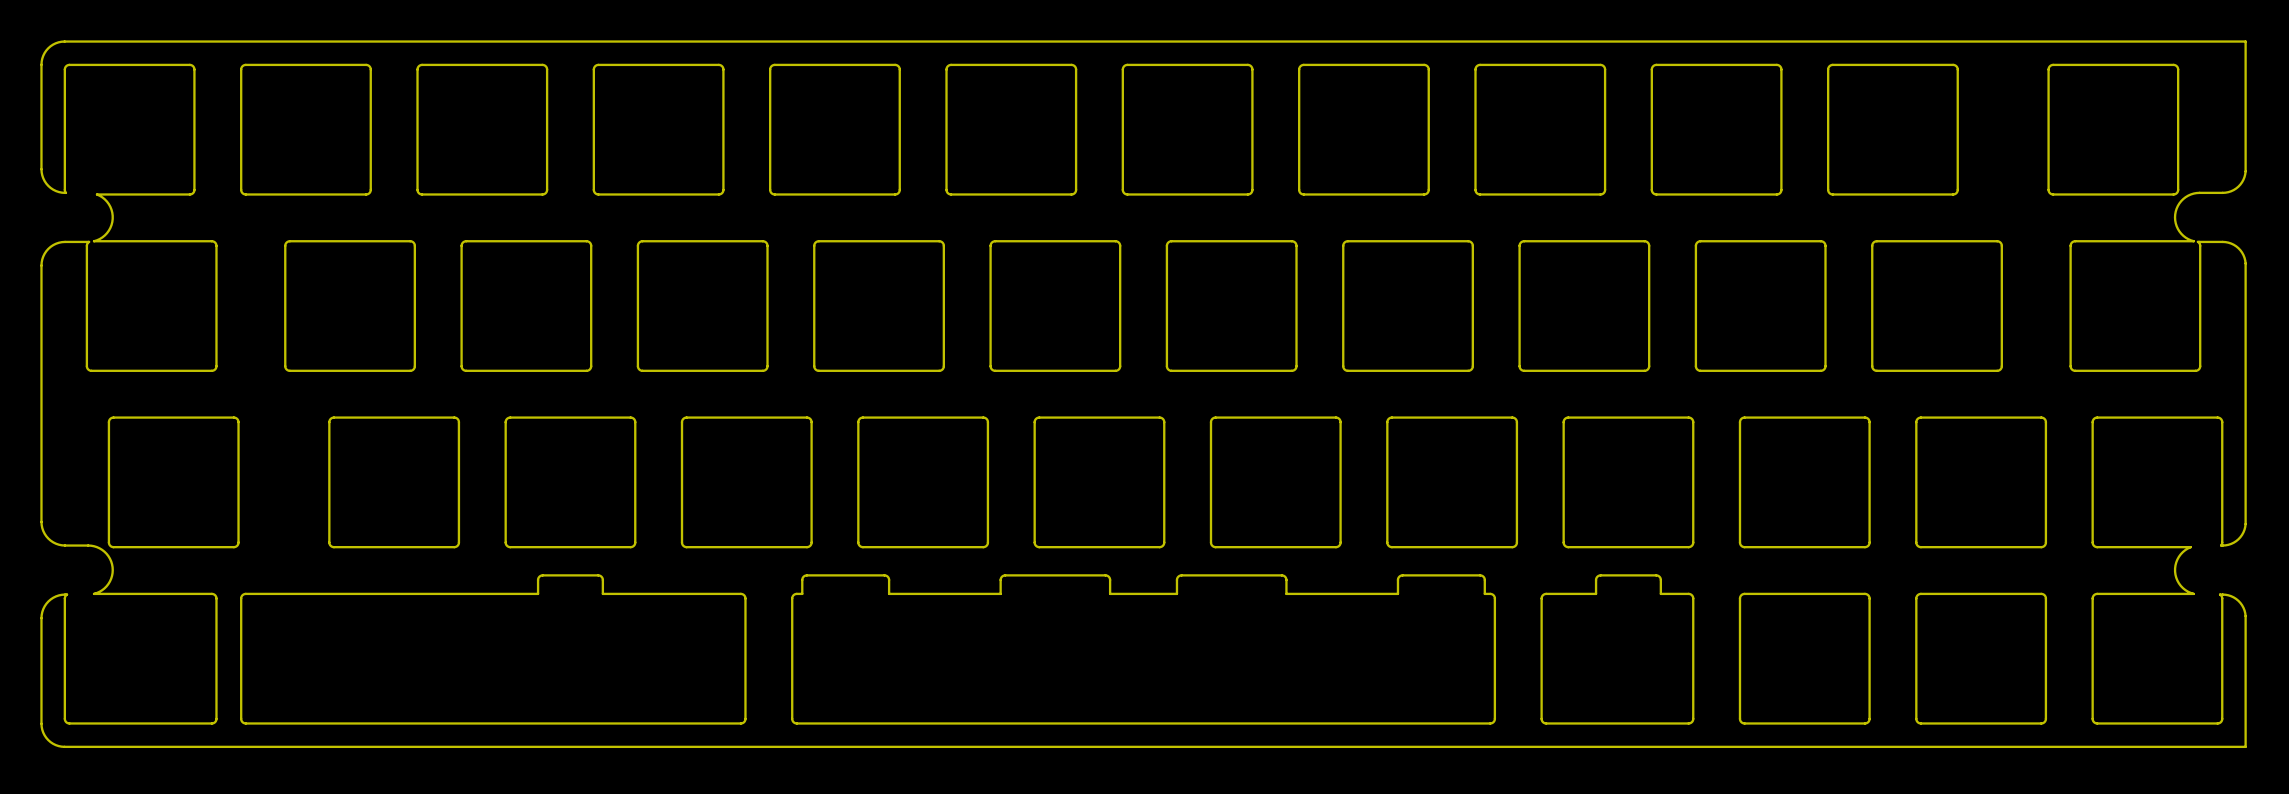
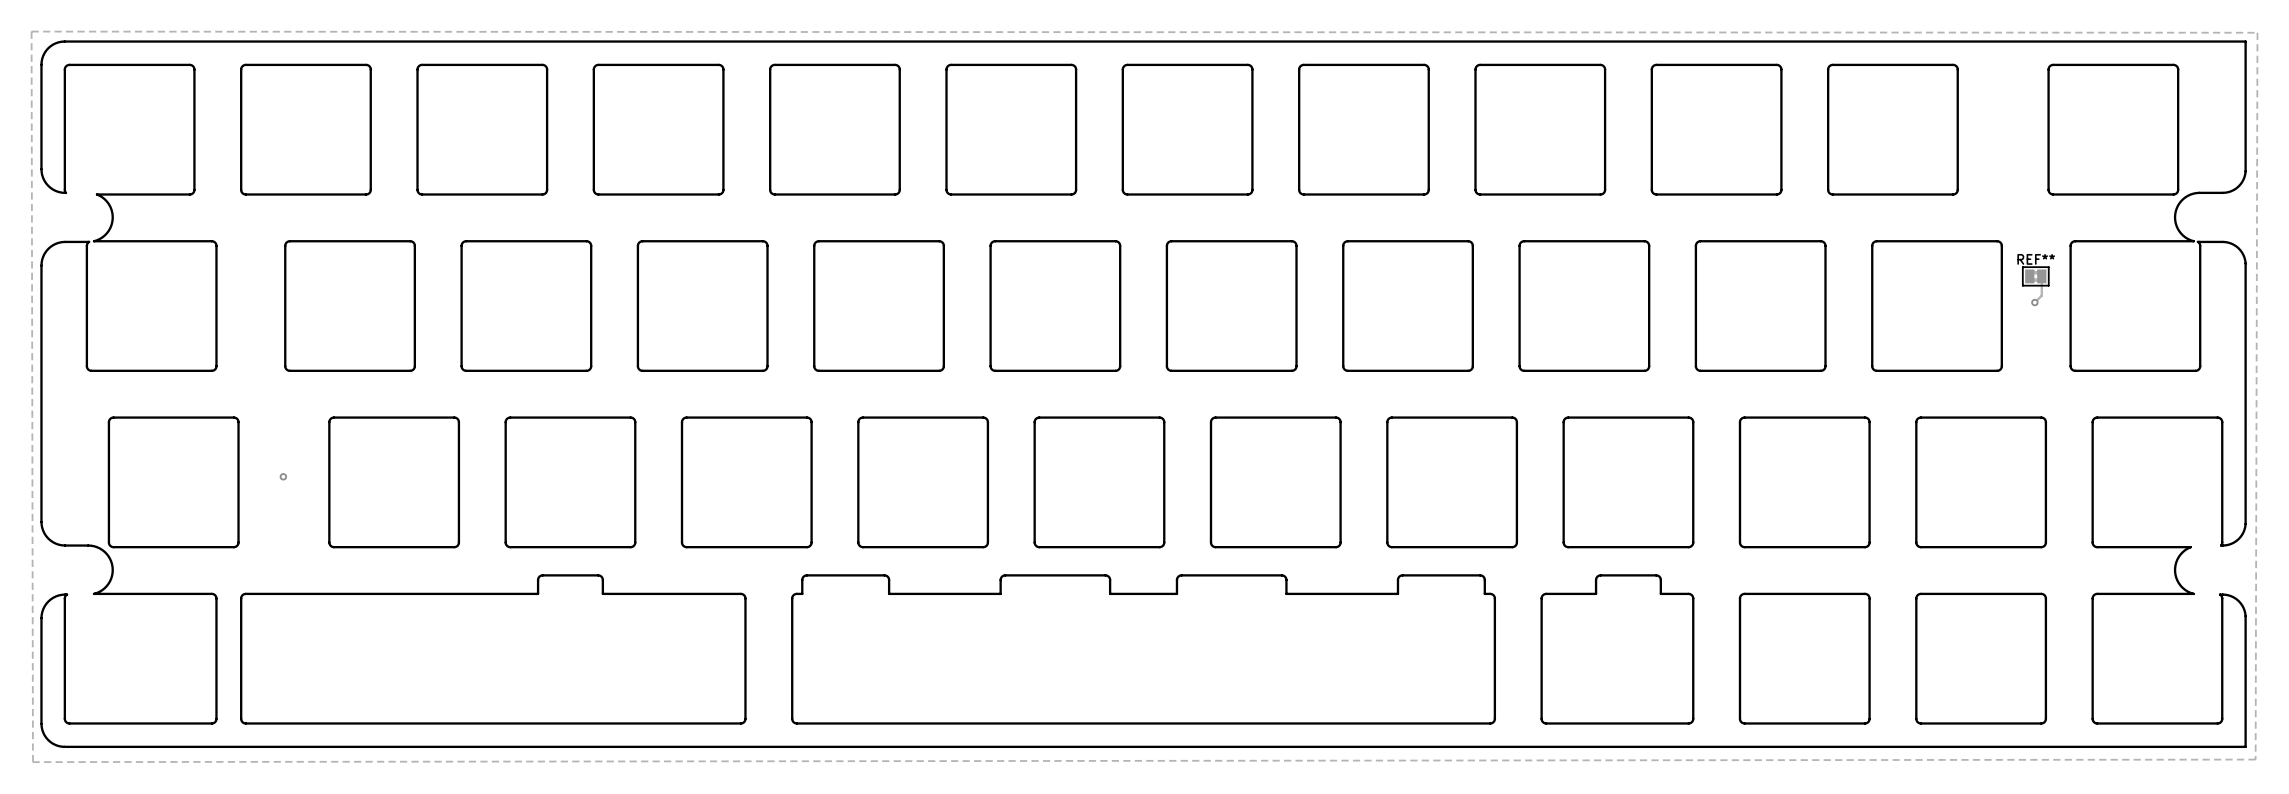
zone outline: none -> (31, 31) (32, 762) (2255, 759) (2257, 32) (31, 31)
REF**: none -> (2035, 276)
track: none -> (2041, 276) (2041, 295) (2034, 302)
via: none -> (2034, 302)
via: none -> (283, 476)

